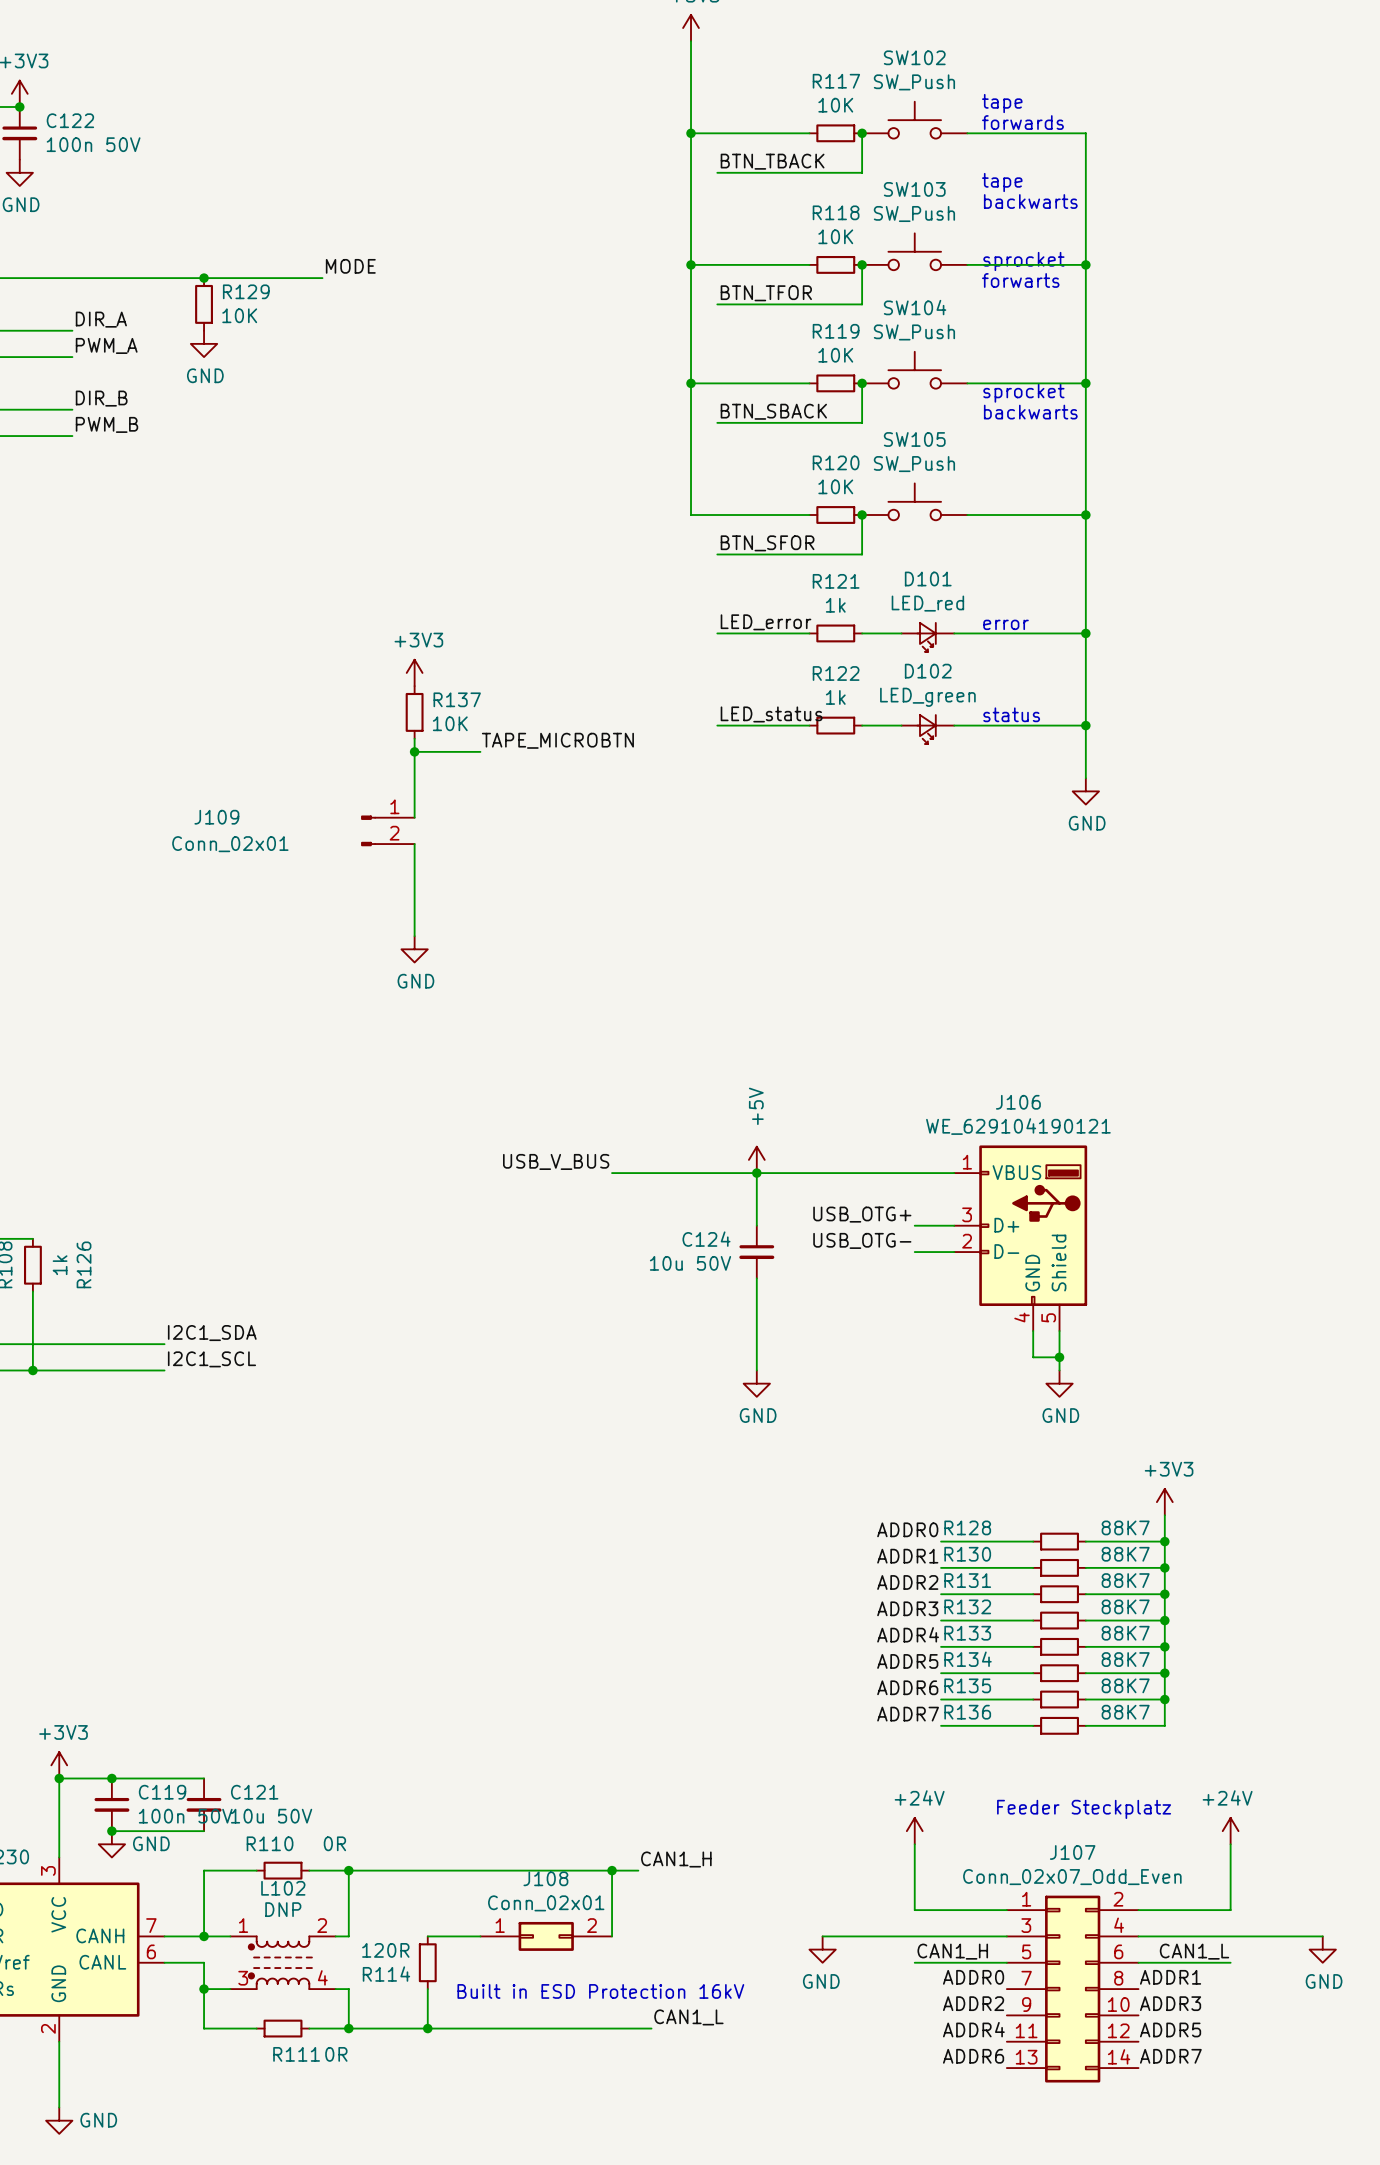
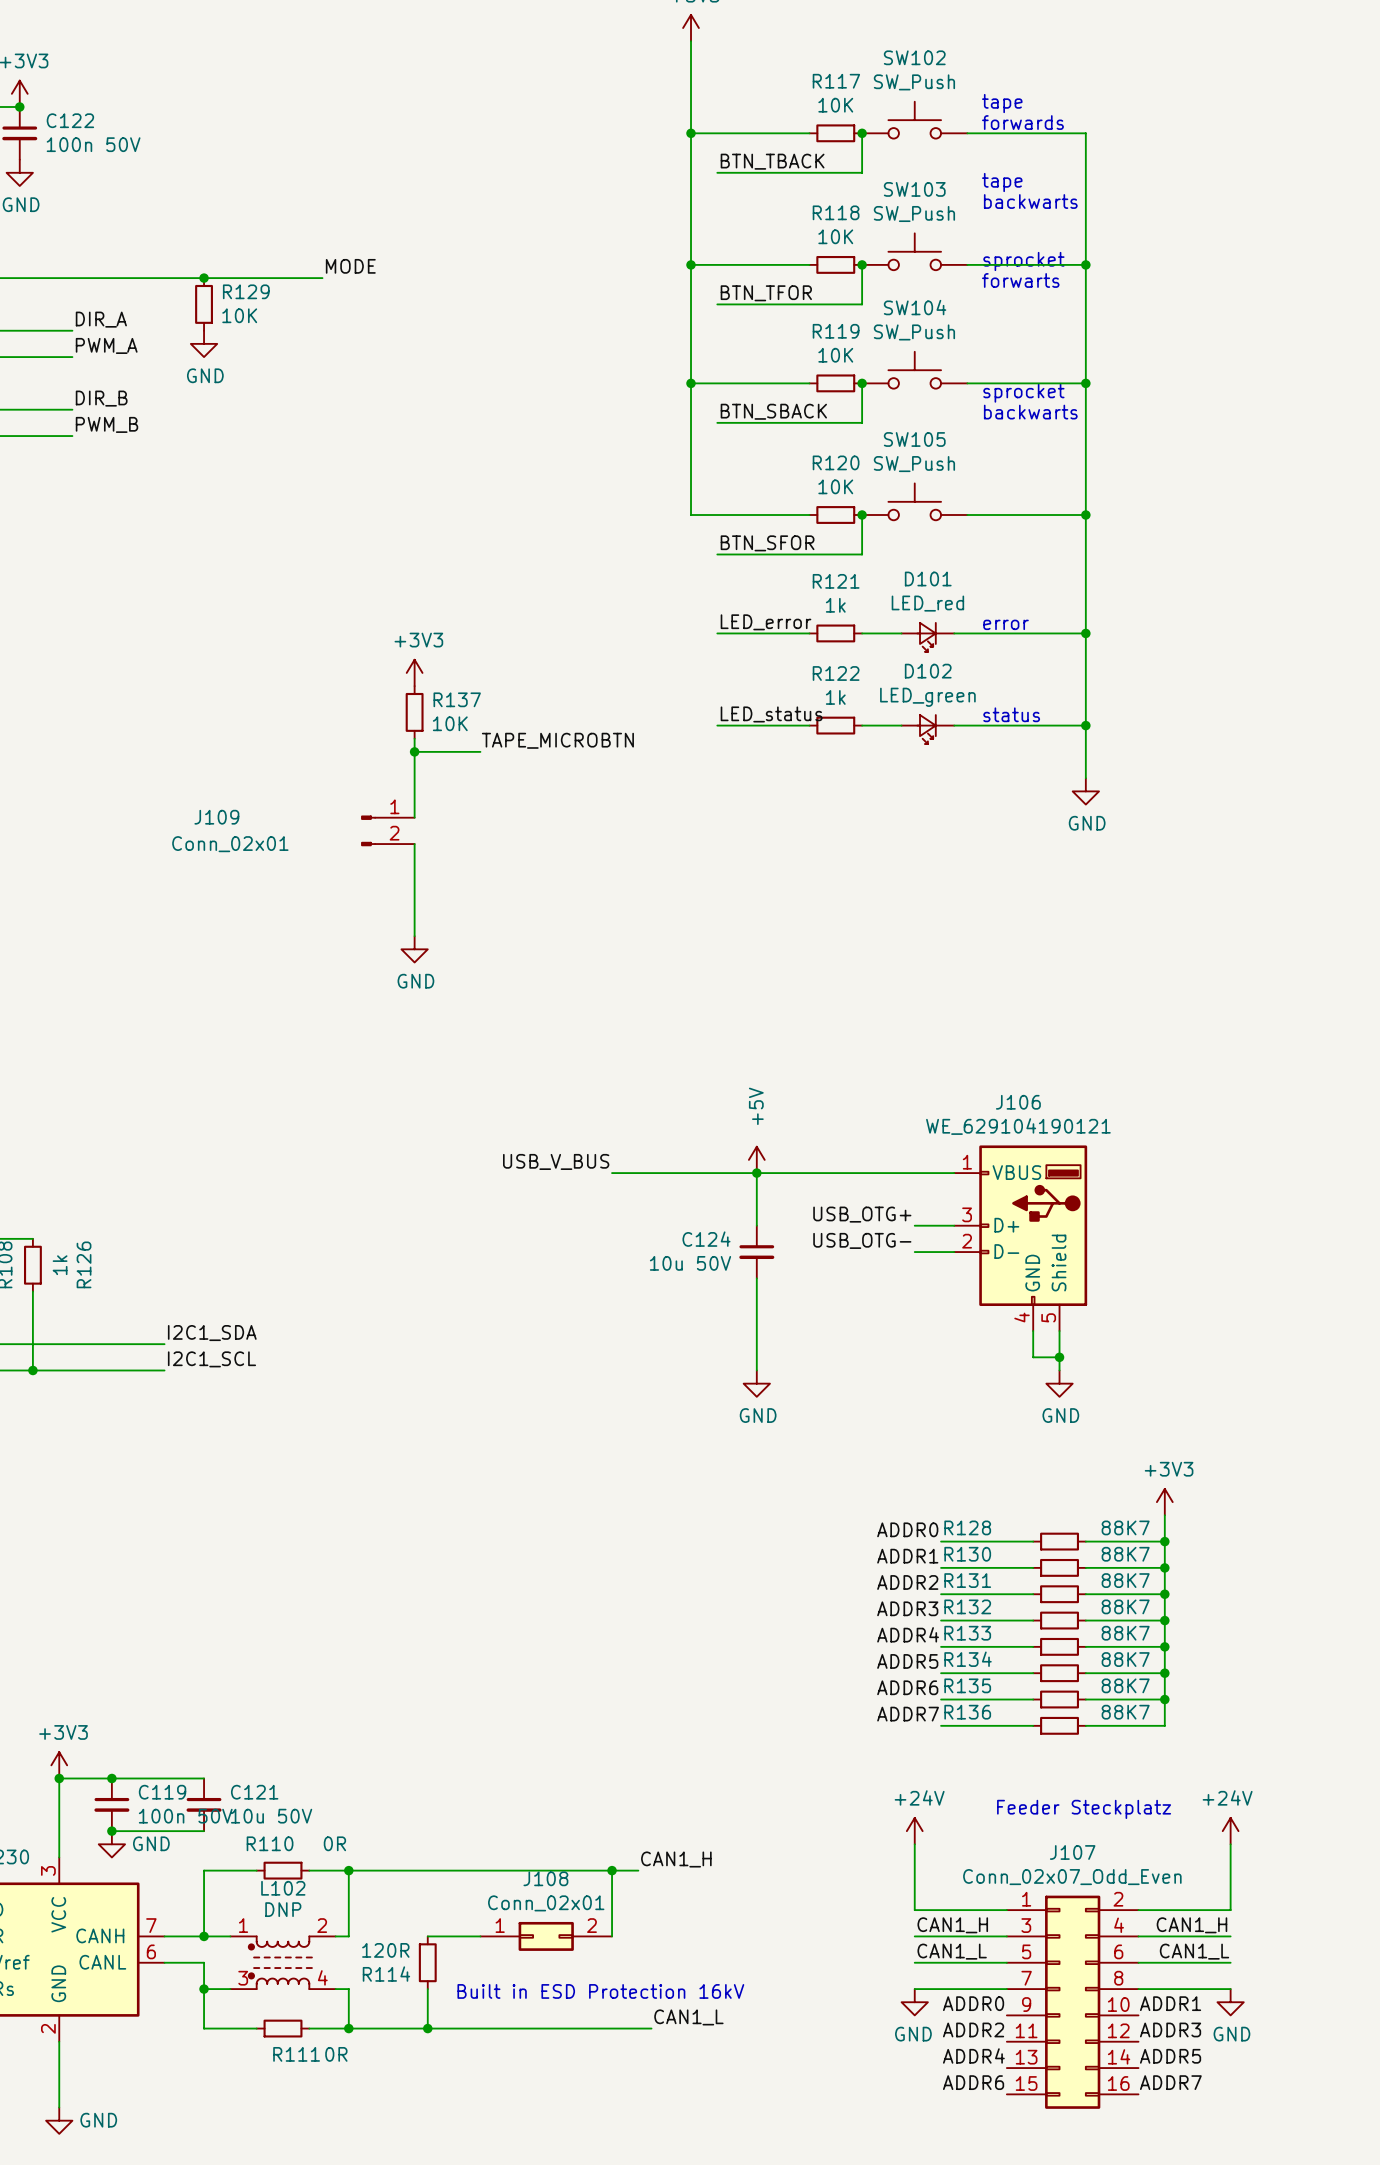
J107 symbol: [1006, 1895, 1139, 2083] -> [1006, 1895, 1139, 2109]
label: none -> CAN1_H (952, 1925)
label: none -> CAN1_H (1191, 1925)
wire: (822, 1936) (914, 1936) -> (914, 1989) (1006, 1989)
wire: (1230, 1936) (1322, 1936) -> (1138, 1989) (1230, 1989)
power symbol position: GND (822, 1949) -> GND (914, 2002)
power symbol position: GND (1322, 1949) -> GND (1230, 2002)
label: CAN1_H (952, 1951) -> CAN1_L (952, 1951)
label: ADDR0 (973, 1977) -> none
label: ADDR1 (1170, 1977) -> none
label: ADDR2 (973, 2003) -> ADDR0 (973, 2003)
label: ADDR3 (1170, 2003) -> ADDR1 (1170, 2003)
label: ADDR4 (973, 2029) -> ADDR2 (973, 2029)
label: ADDR5 (1170, 2029) -> ADDR3 (1170, 2029)
label: ADDR6 (973, 2056) -> ADDR4 (973, 2055)
label: ADDR7 (1170, 2056) -> ADDR5 (1170, 2056)
label: none -> ADDR6 (973, 2082)
label: none -> ADDR7 (1170, 2082)

